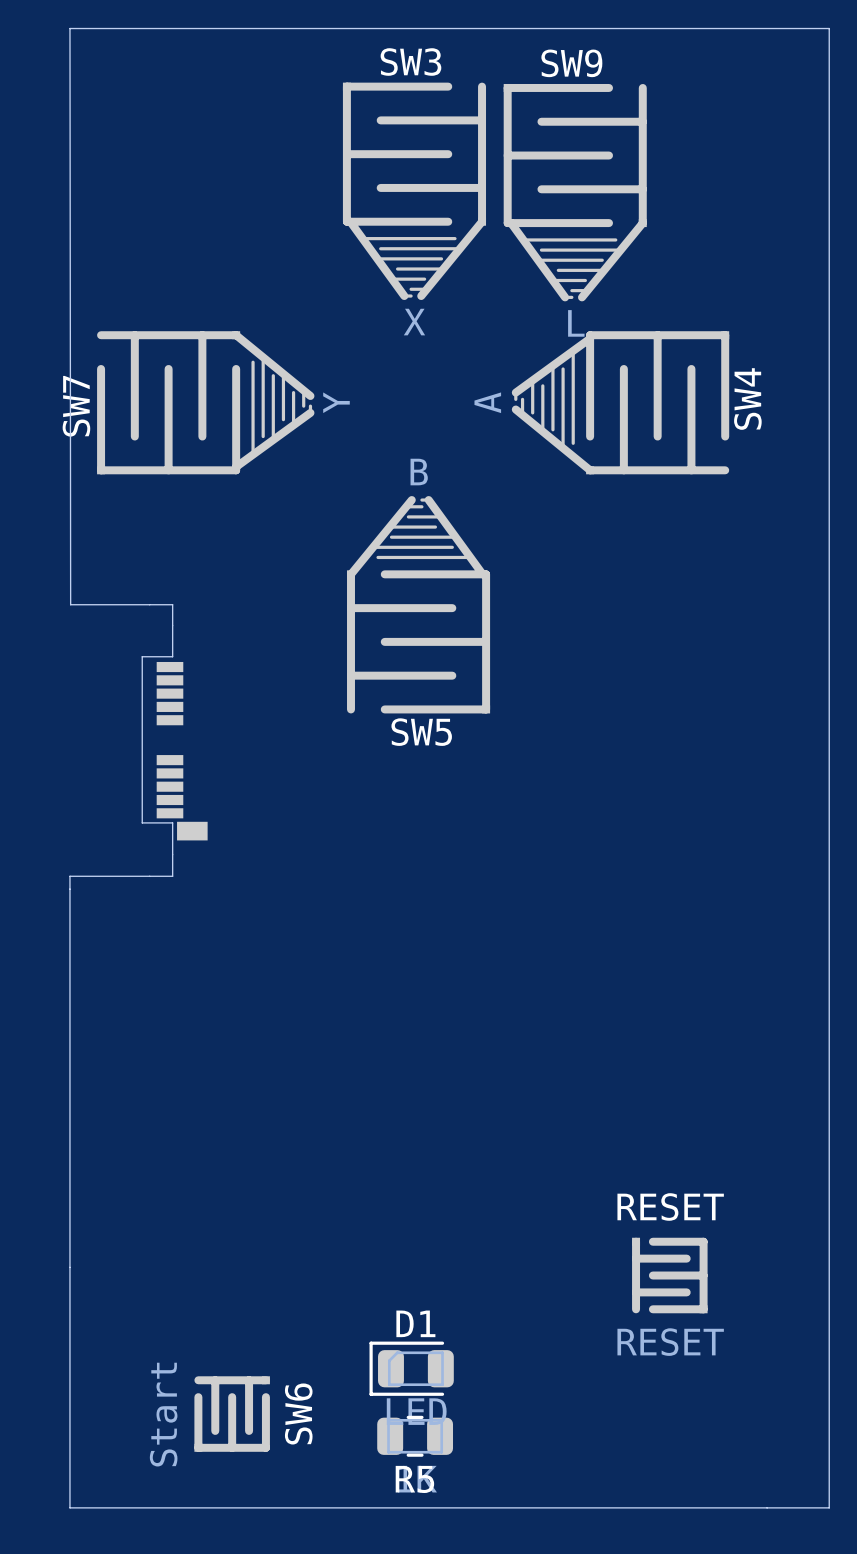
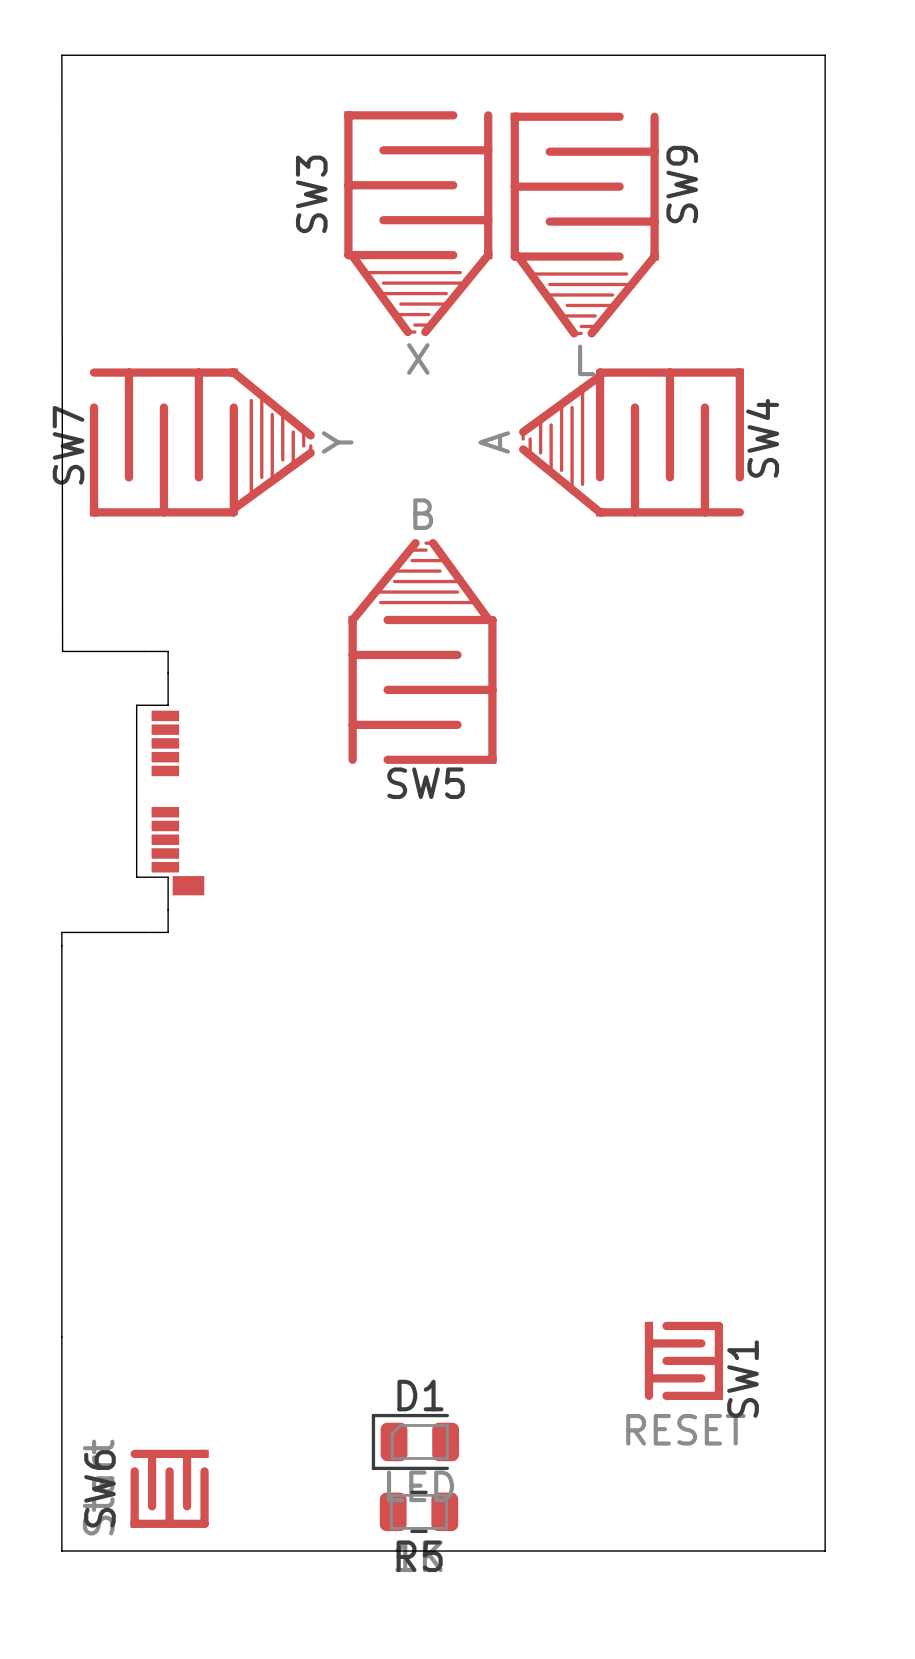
board edge: (807, 28) (829, 28) (829, 1507) (69, 1507) (69, 1474) -> (825, 55) (825, 1551) (61, 1551)
SW3 name rotation: 0° (410, 62) -> 90° counterclockwise (311, 194)
SW3 name position: SW3 (410, 62) -> SW3 (311, 194)
SW9 name rotation: 0° (571, 63) -> 90° counterclockwise (682, 184)
SW9 name position: SW9 (571, 63) -> SW9 (682, 184)
RESET name: RESET (670, 1206) -> SW1 (743, 1379)
RESET position: (669, 1275) -> (683, 1360)
SW6 name position: SW6 (298, 1413) -> SW6 (99, 1488)
SW6 position: (232, 1414) -> (169, 1488)

